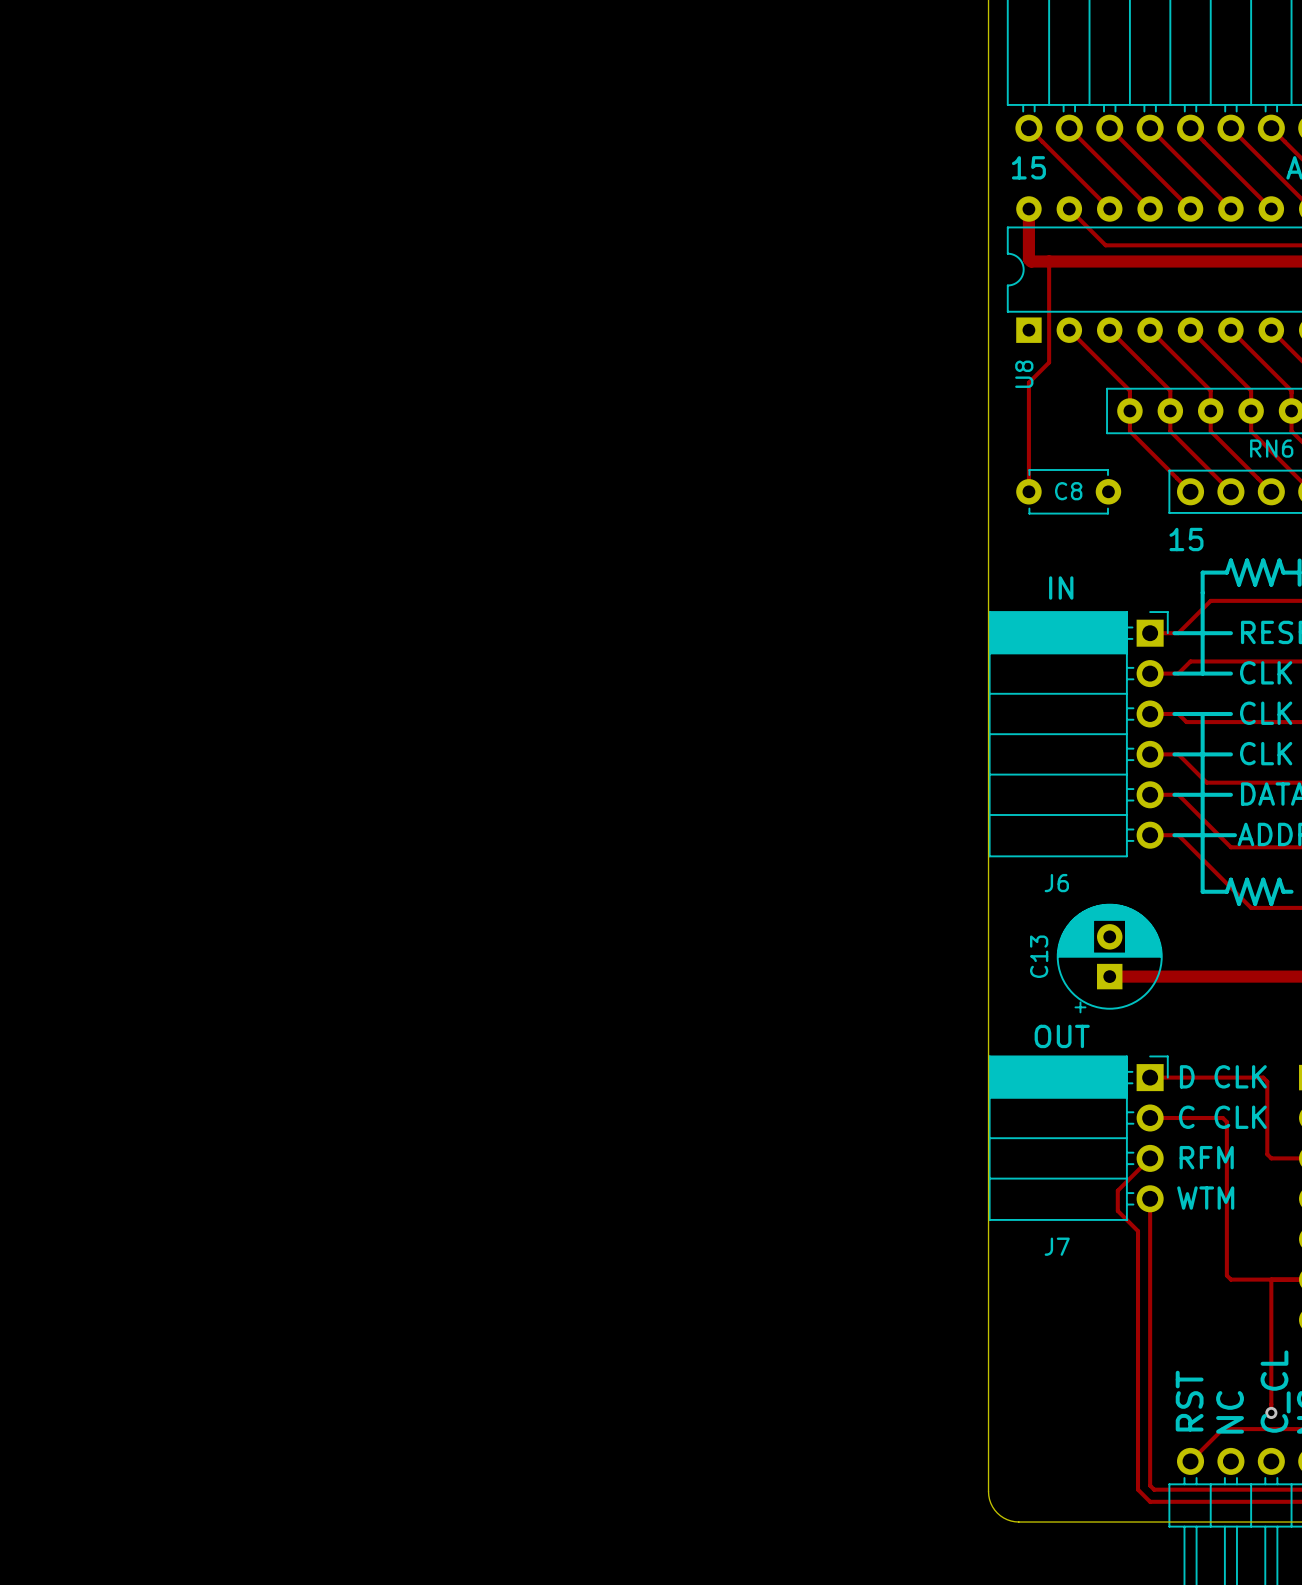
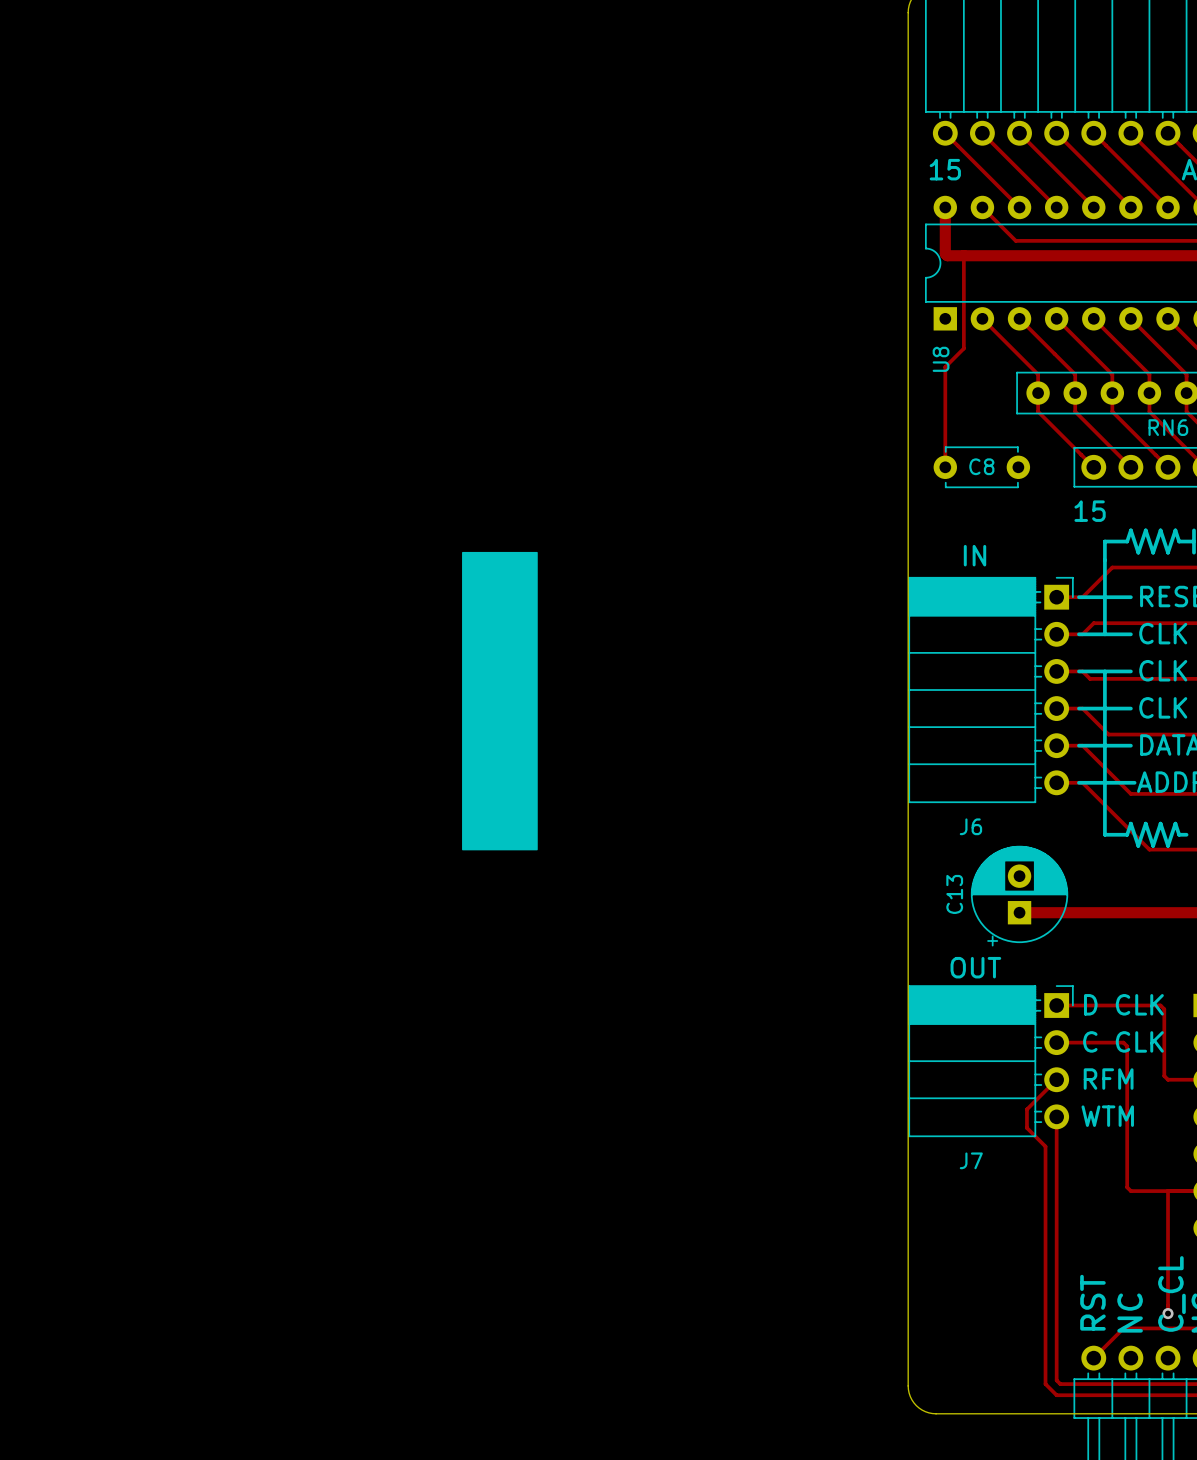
drawing: none -> [462, 551, 538, 851]

